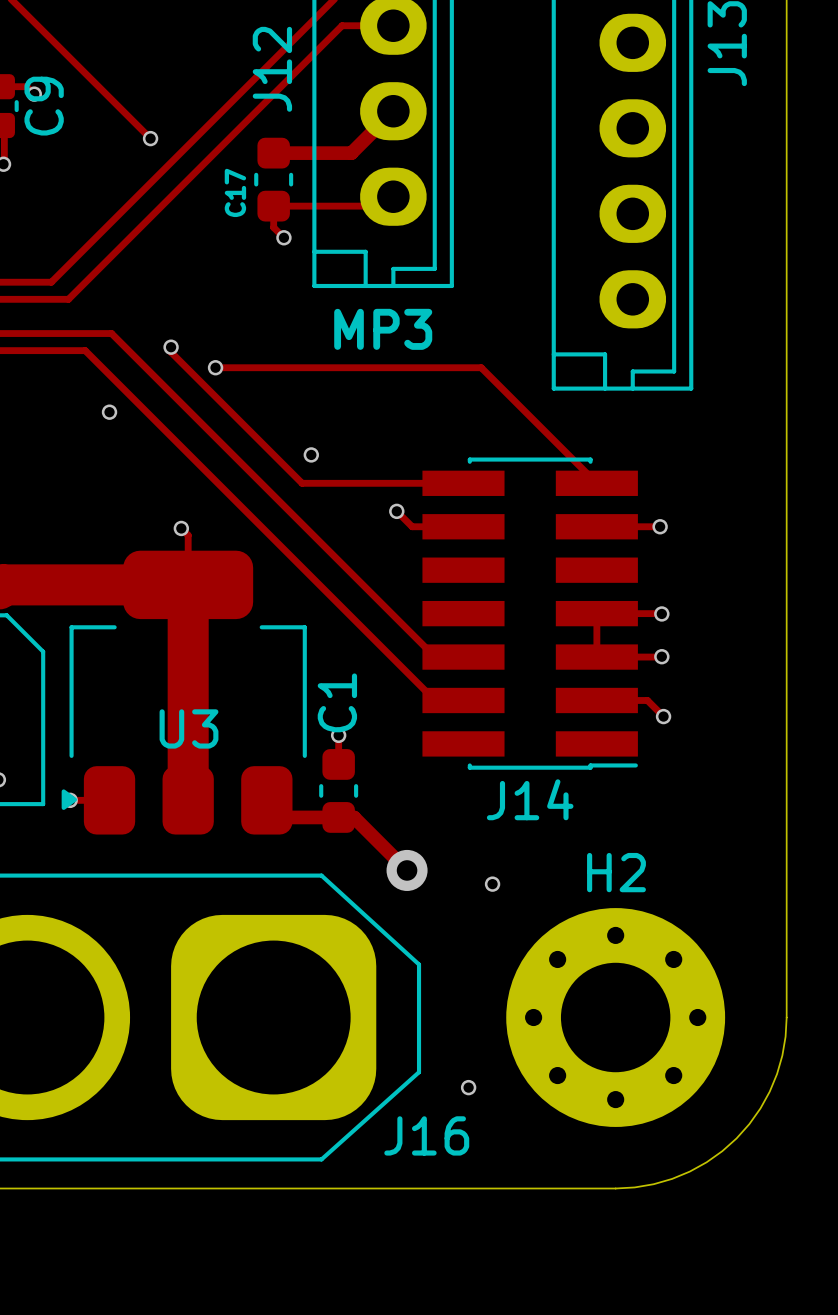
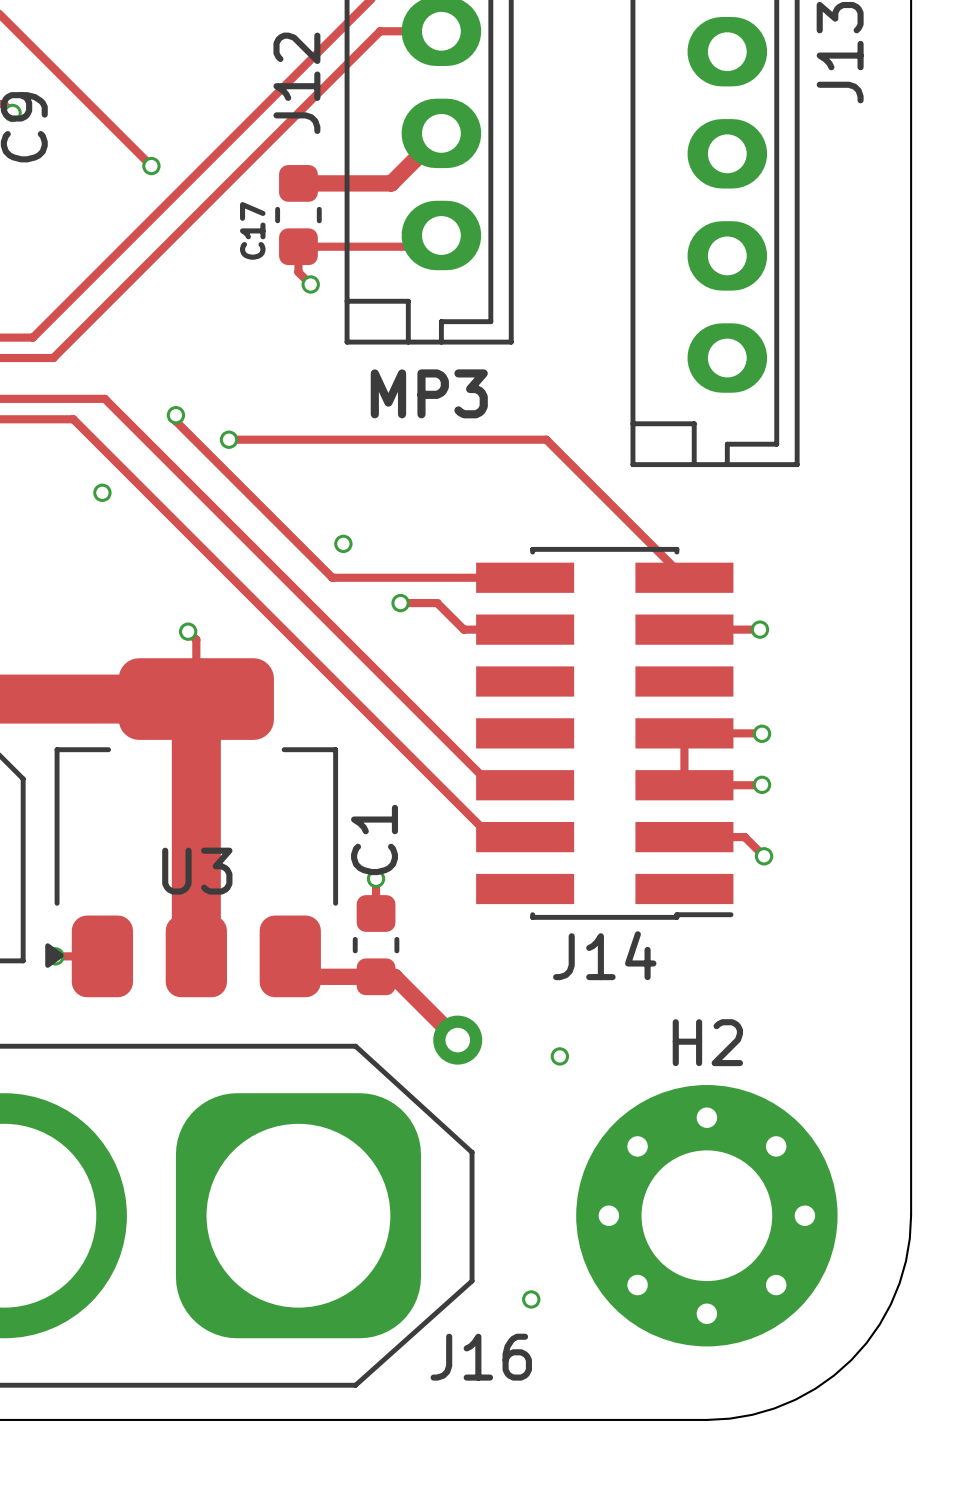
track: none -> (400, 603) (437, 603) (445, 611)
via position: (396, 511) -> (400, 603)

